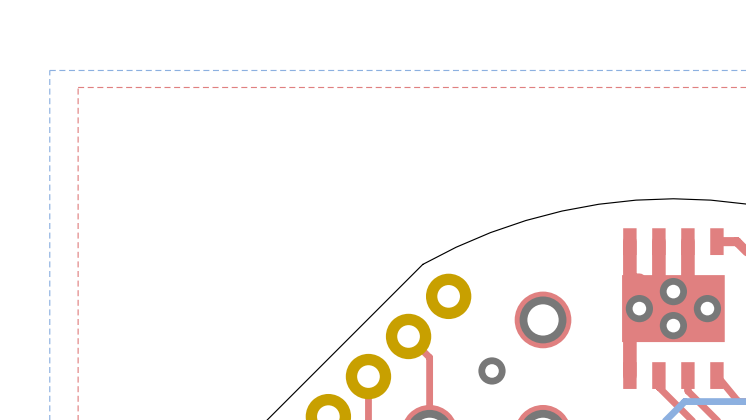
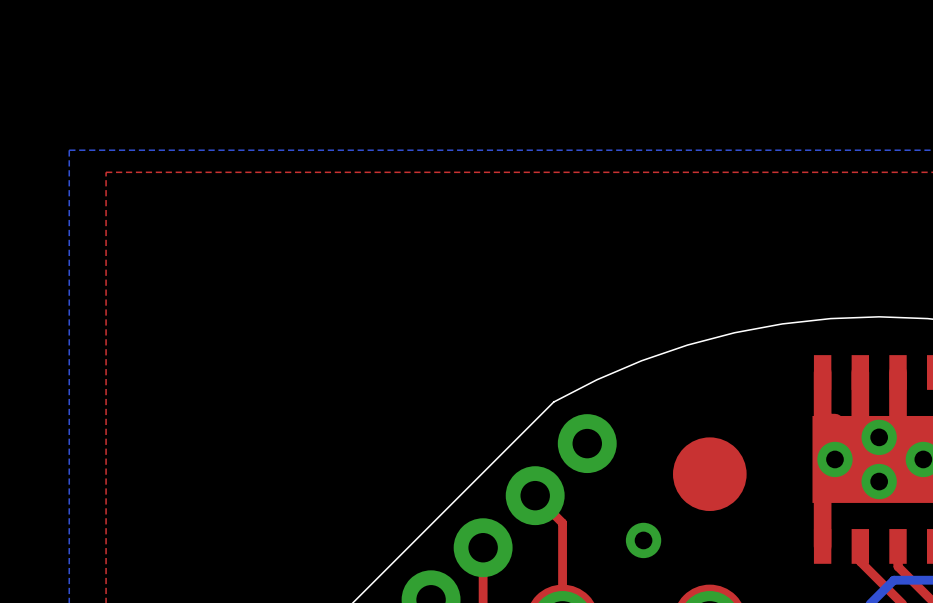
via: (543, 319) -> none

